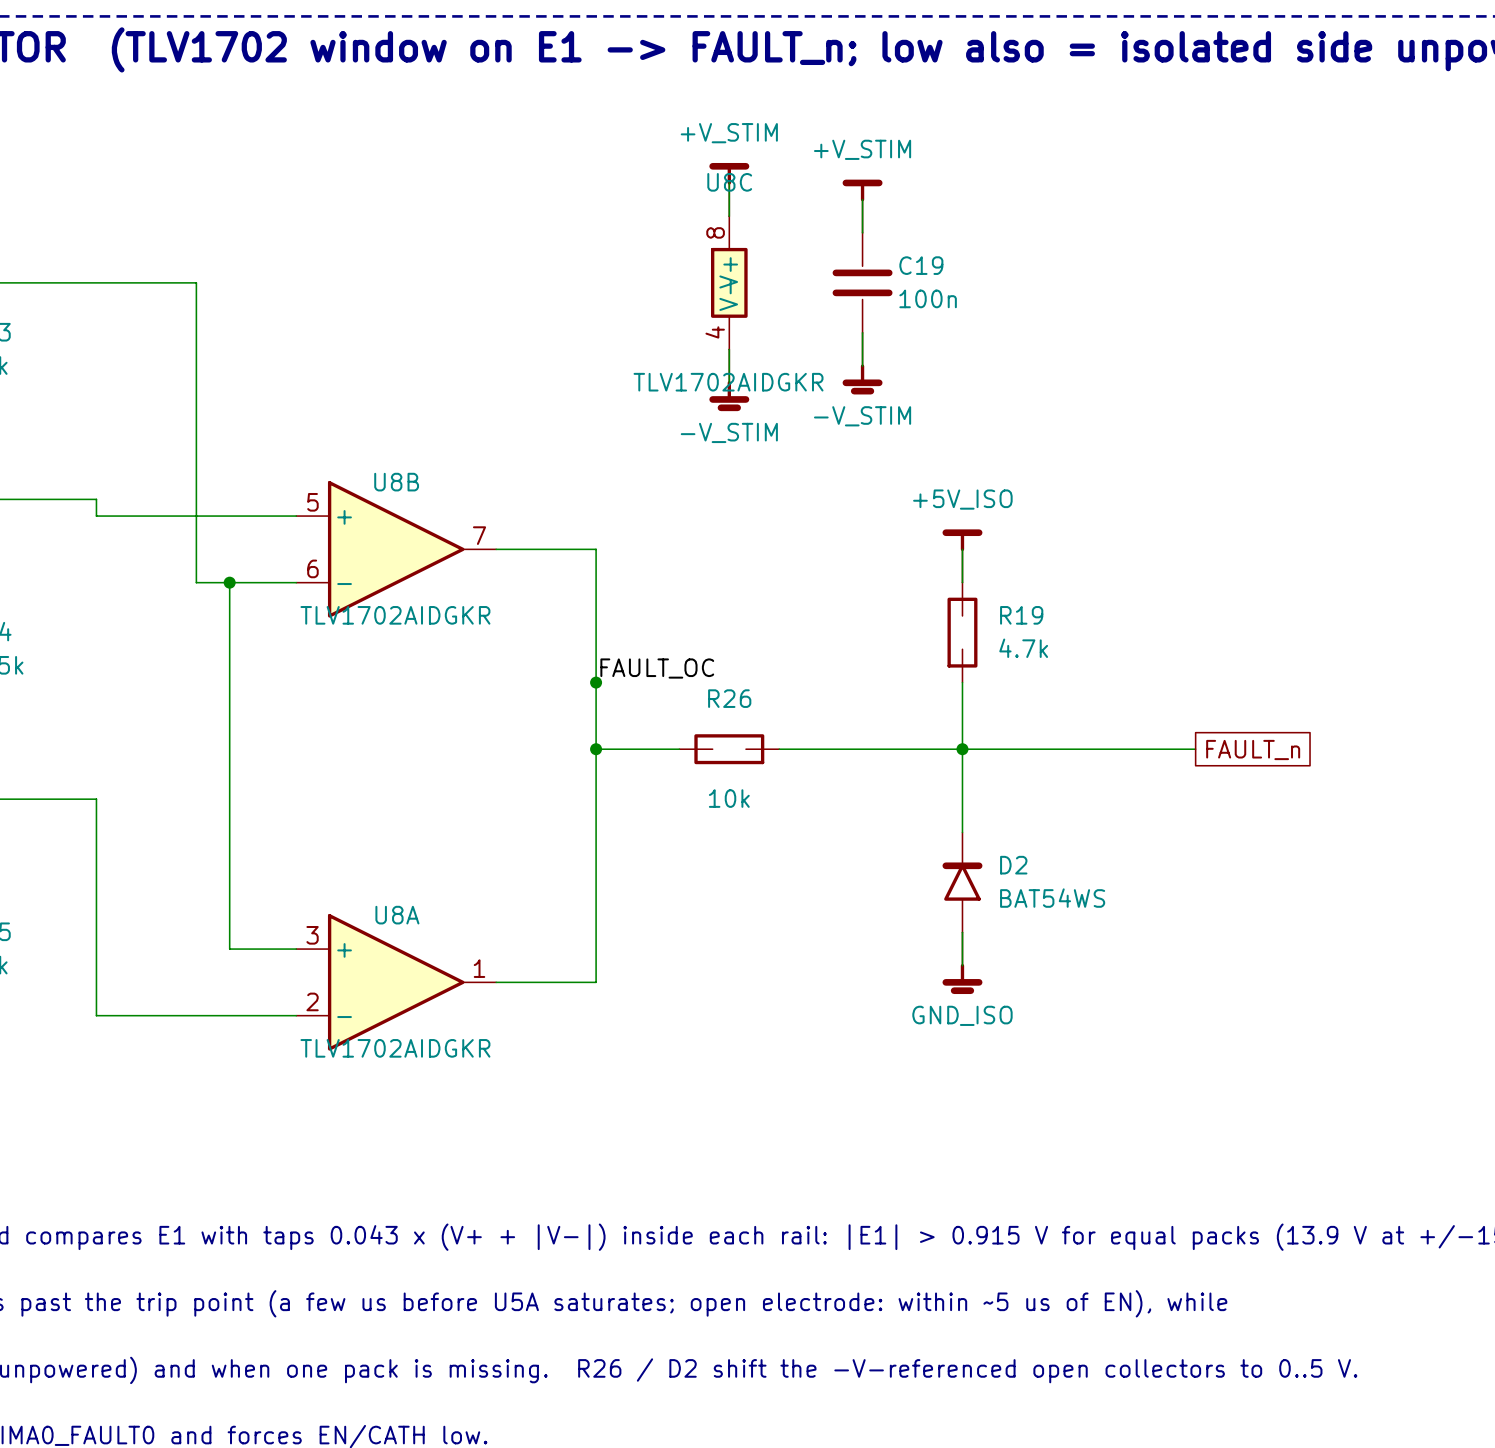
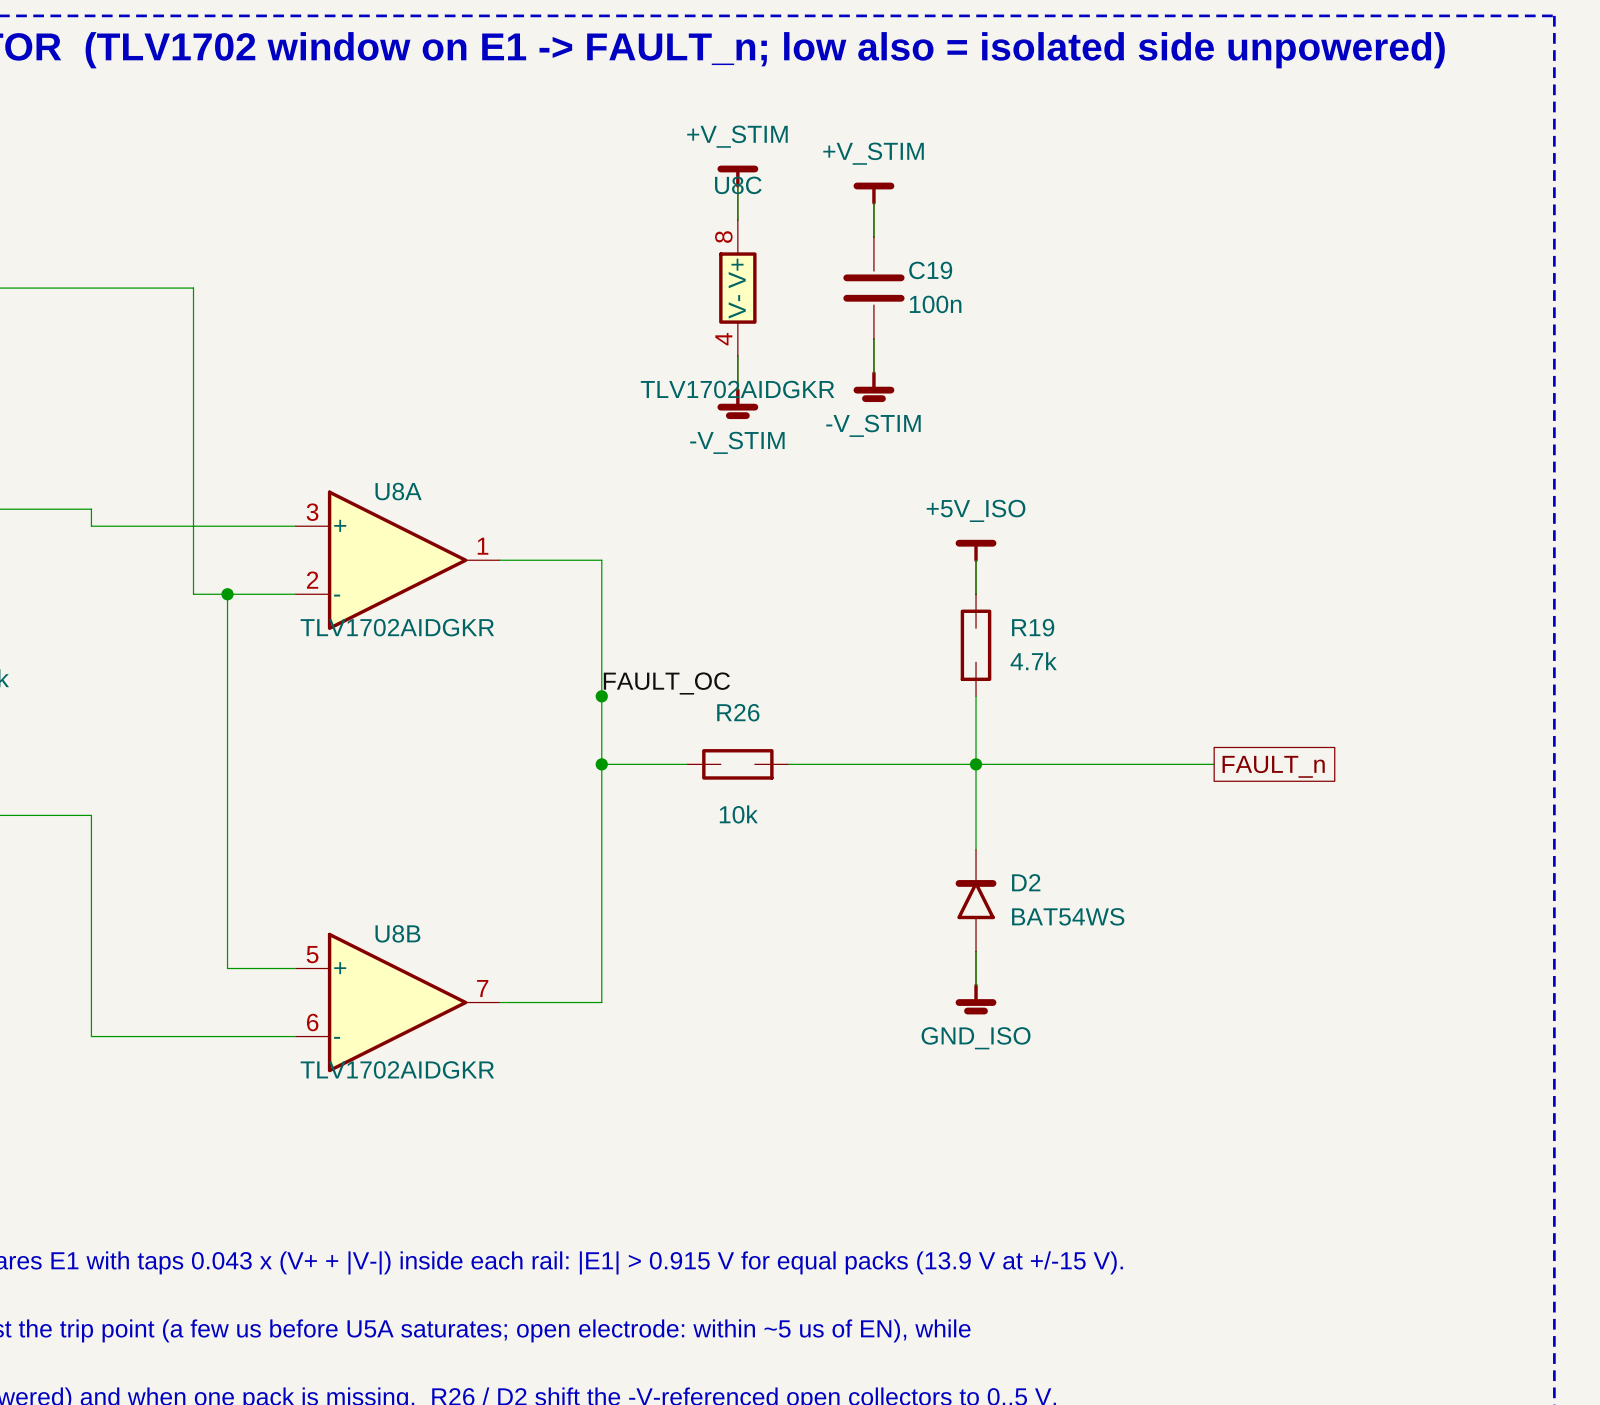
U8B position: (396, 549) -> (397, 1002)
U8A position: (396, 982) -> (397, 560)

